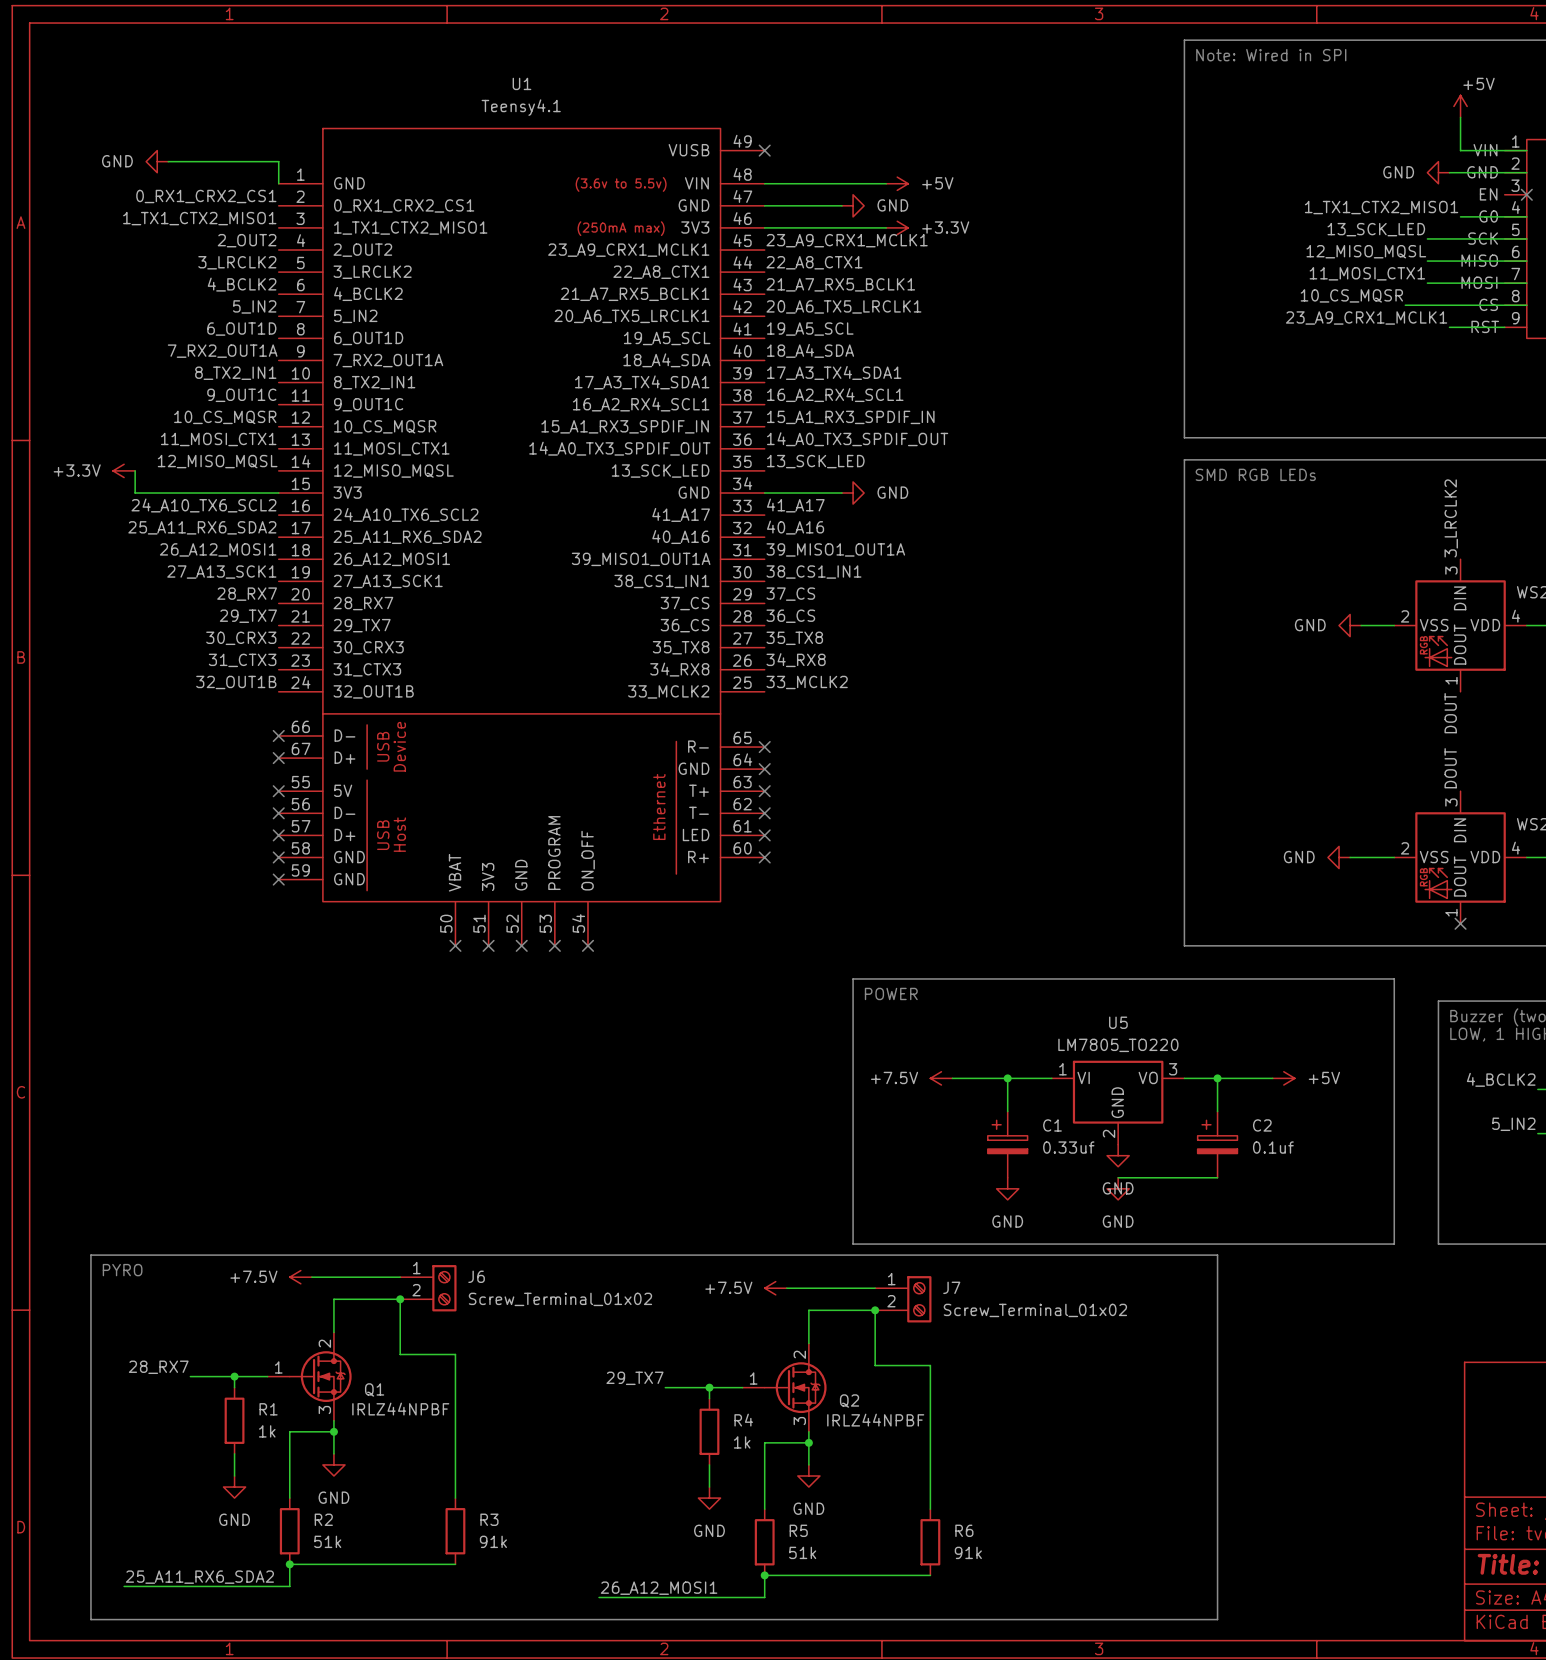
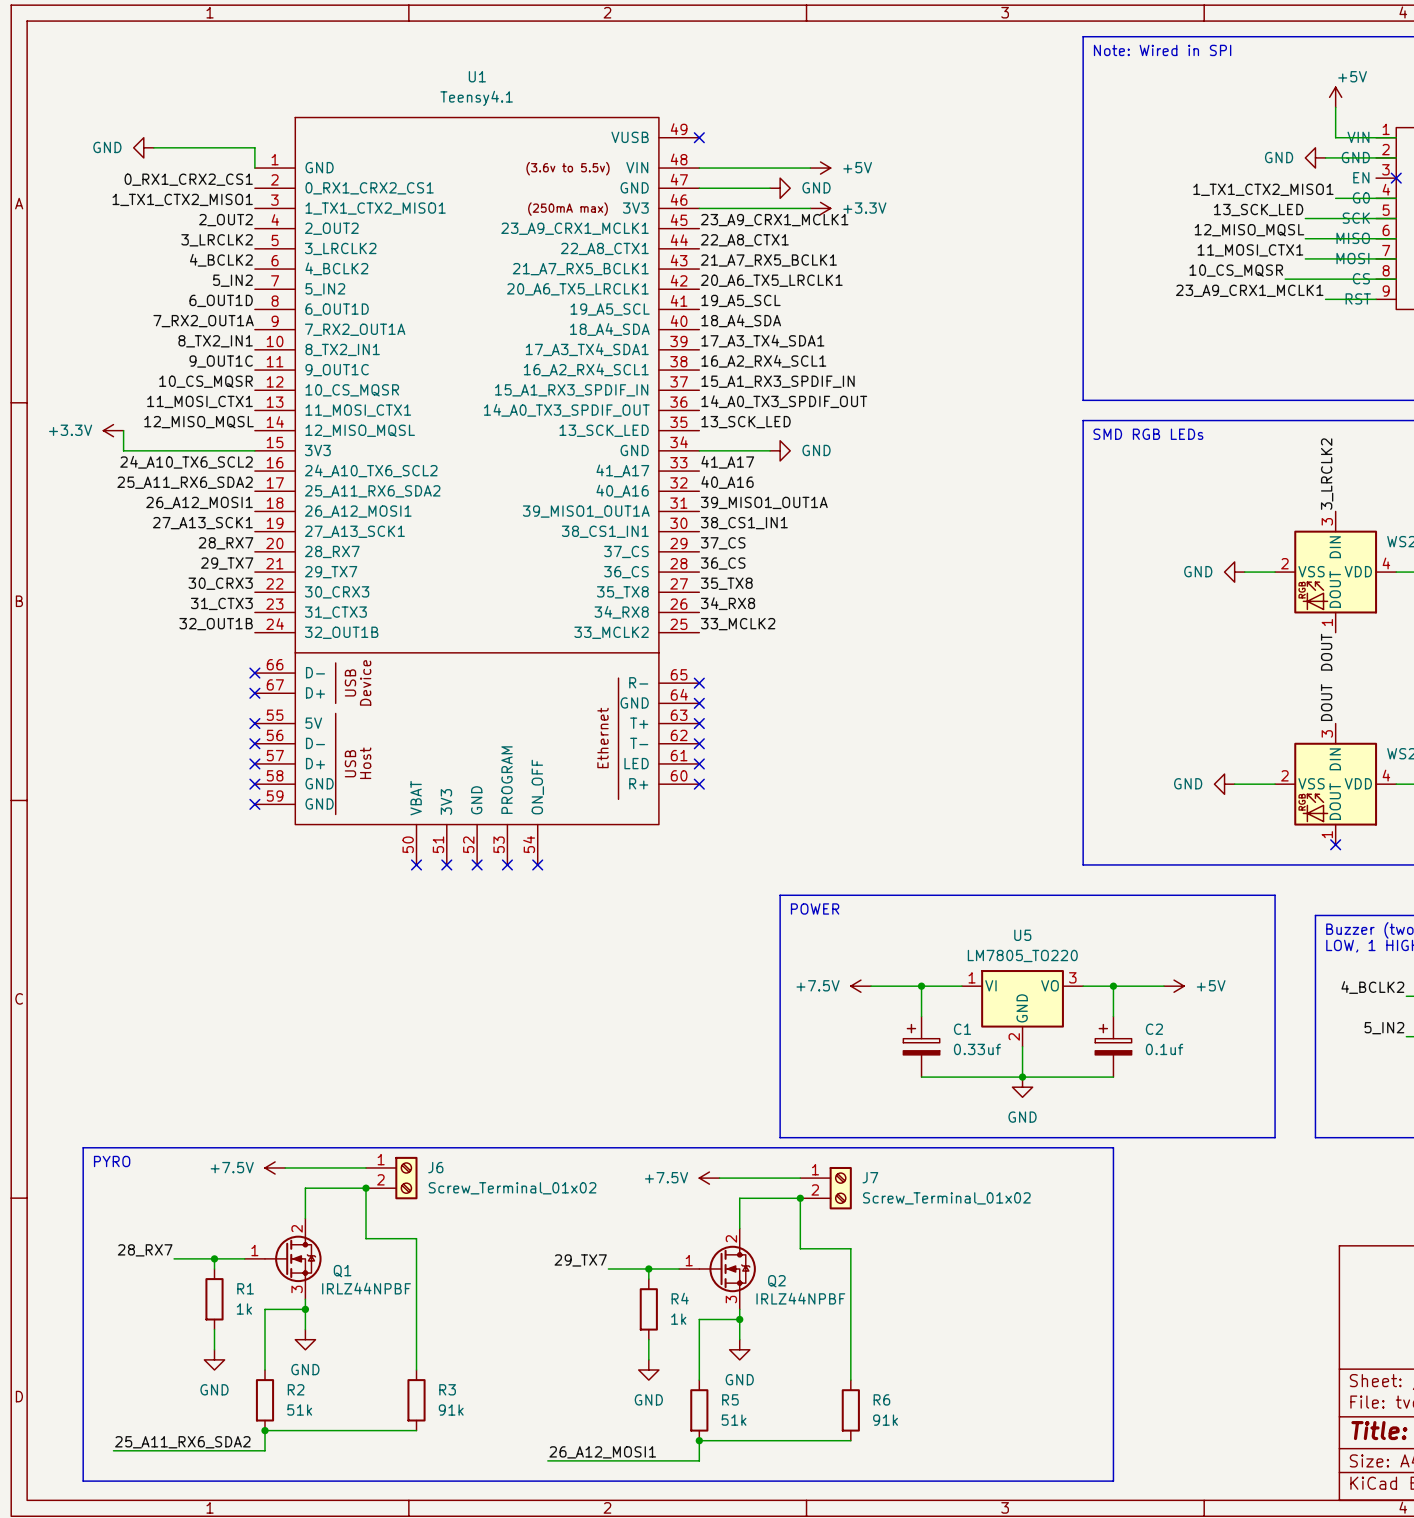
wire: none -> (1022, 1046) (1022, 1077) (921, 1077)
power symbol: GND (1118, 1155) -> none
junction: none -> (1022, 1077)
power symbol: GND (1007, 1188) -> none

